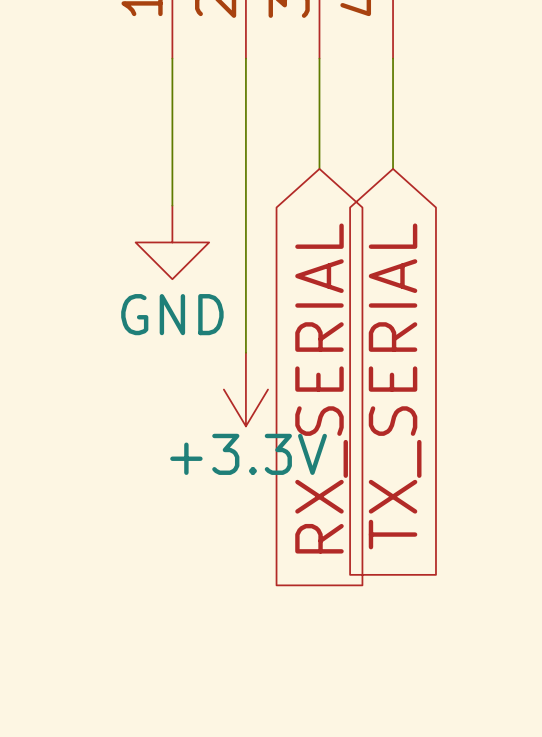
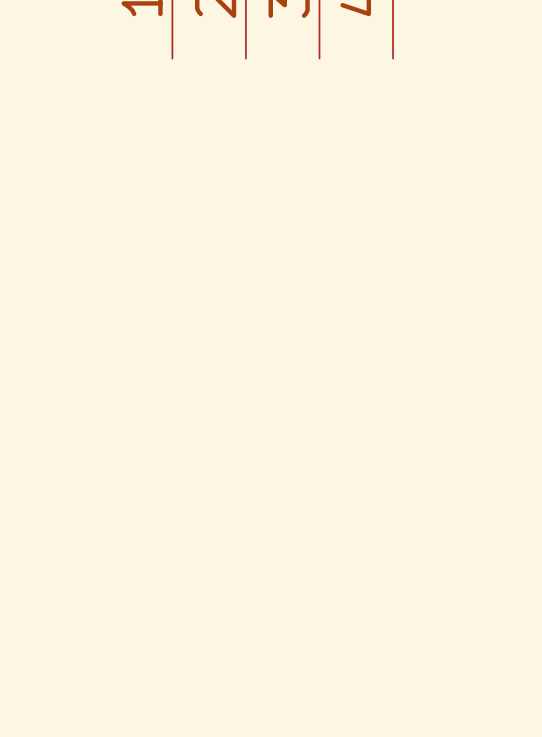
wire: (172, 58) (172, 205) -> none
wire: (245, 58) (245, 352) -> none
wire: (319, 58) (319, 168) -> none
wire: (393, 58) (393, 168) -> none
power symbol: GND (172, 242) -> none
global label: TX_SERIAL (395, 386) -> none
global label: RX_SERIAL (321, 388) -> none
power symbol: +3.3V (245, 389) -> none

